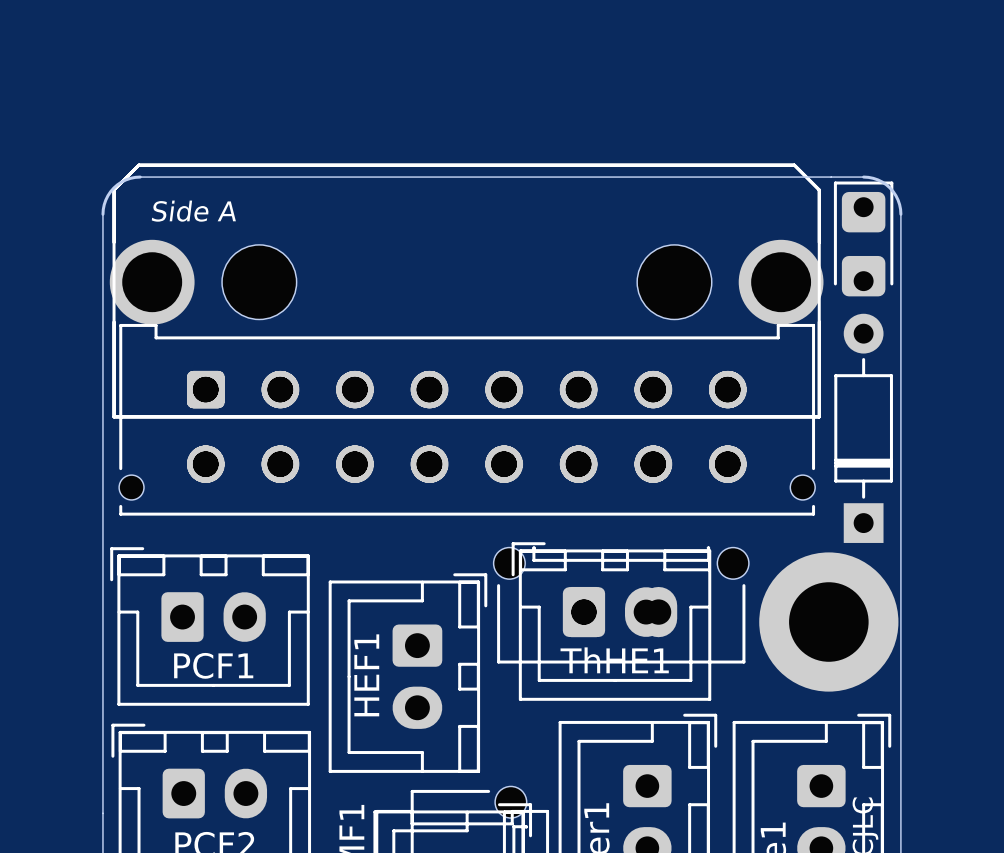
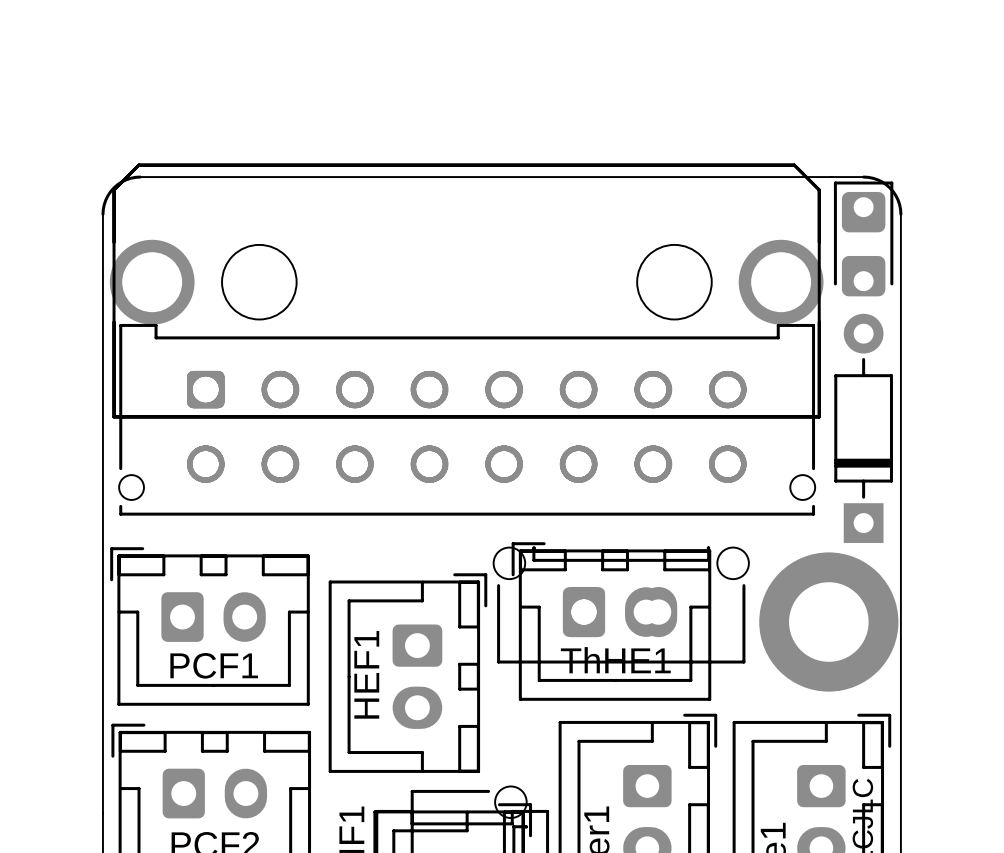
text: Side A (193, 211) -> none

